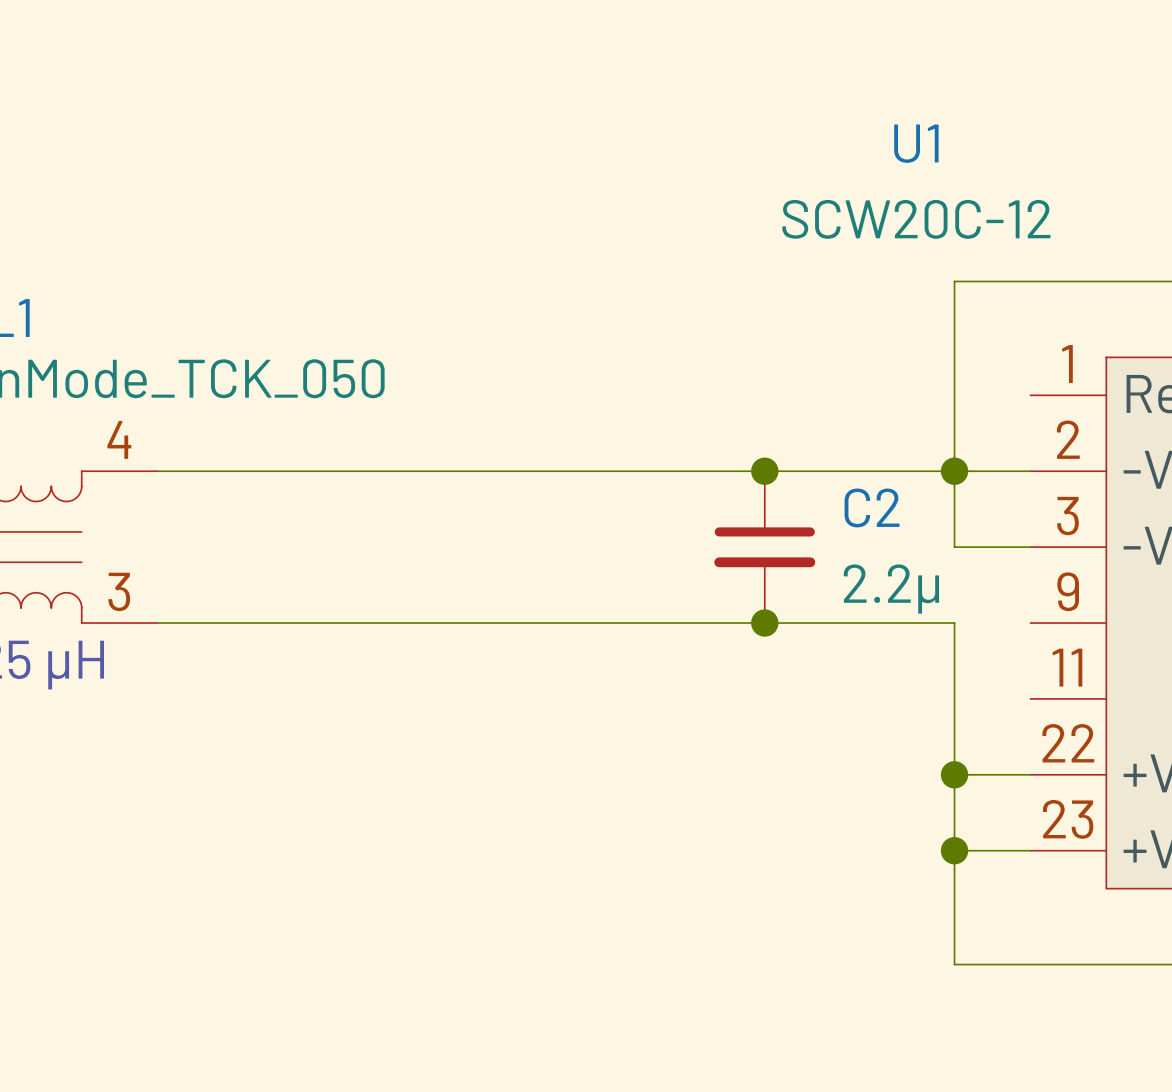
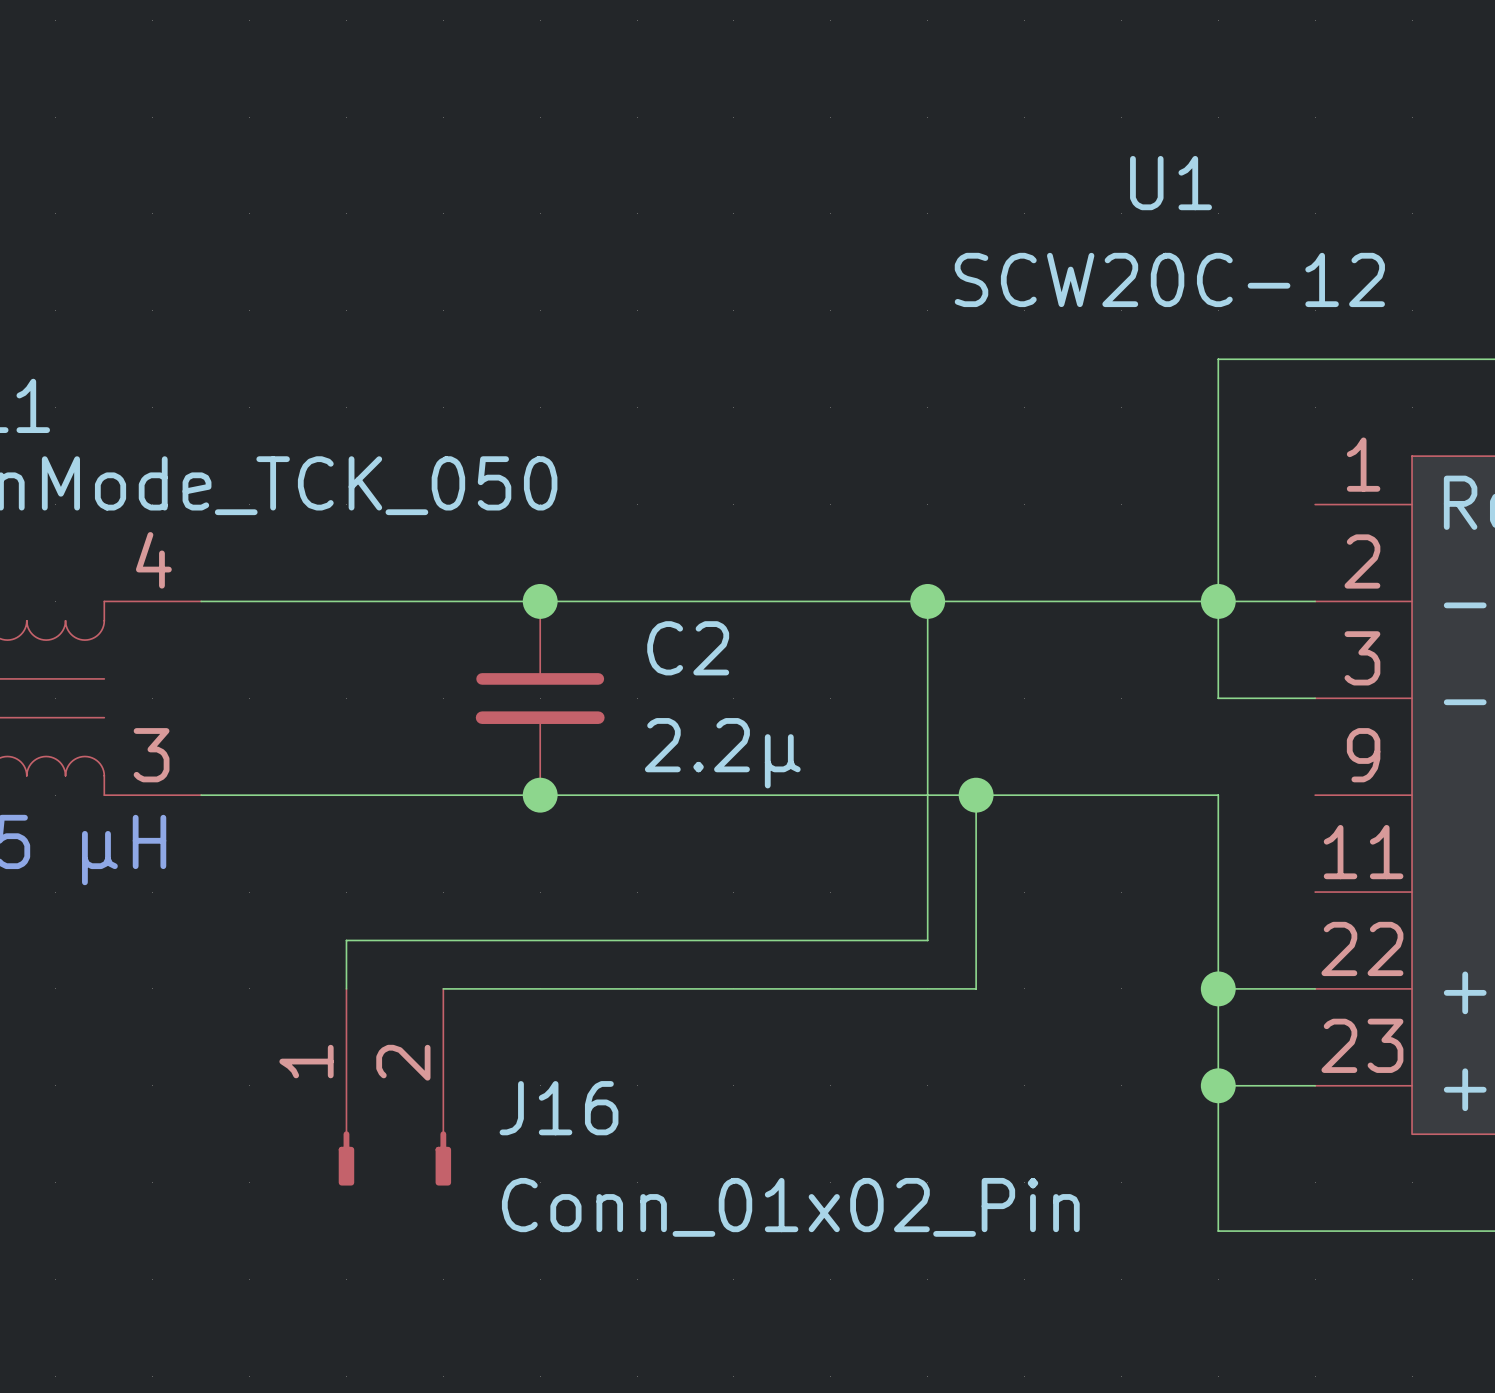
junction: none -> (540, 601)
wire: none -> (927, 601) (927, 940) (346, 940) (346, 988)
junction position: (764, 471) -> (927, 601)
C2 position: (764, 547) -> (540, 698)
junction: none -> (540, 795)
wire: none -> (976, 795) (976, 988) (443, 988)
J16: none -> Conn_01x02_Pin (394, 1087)

